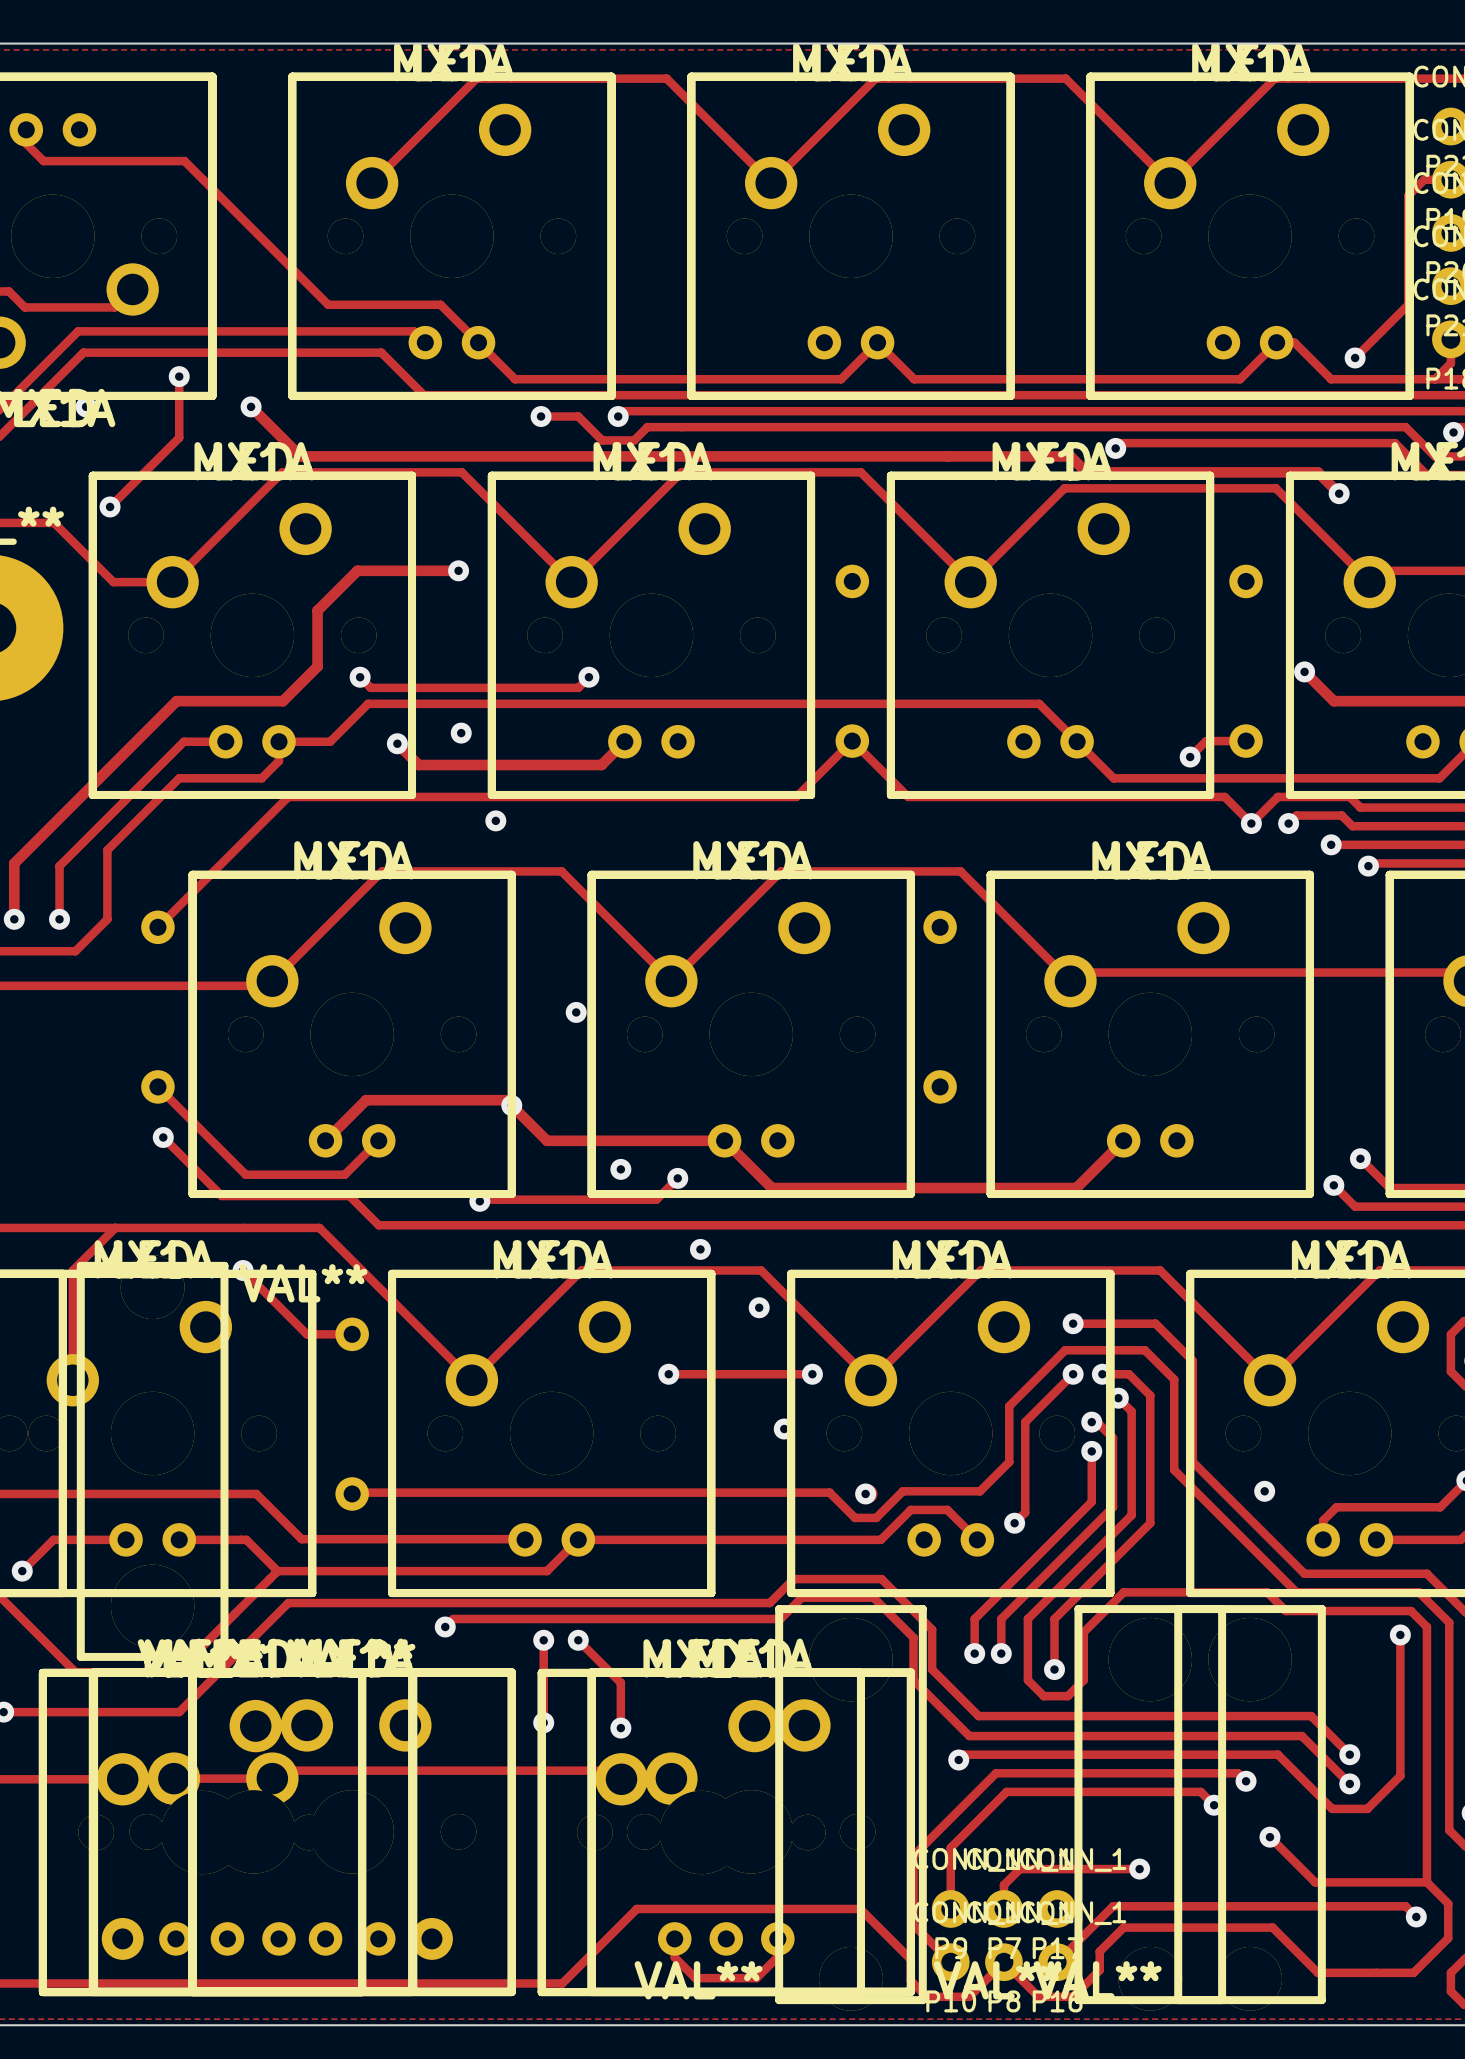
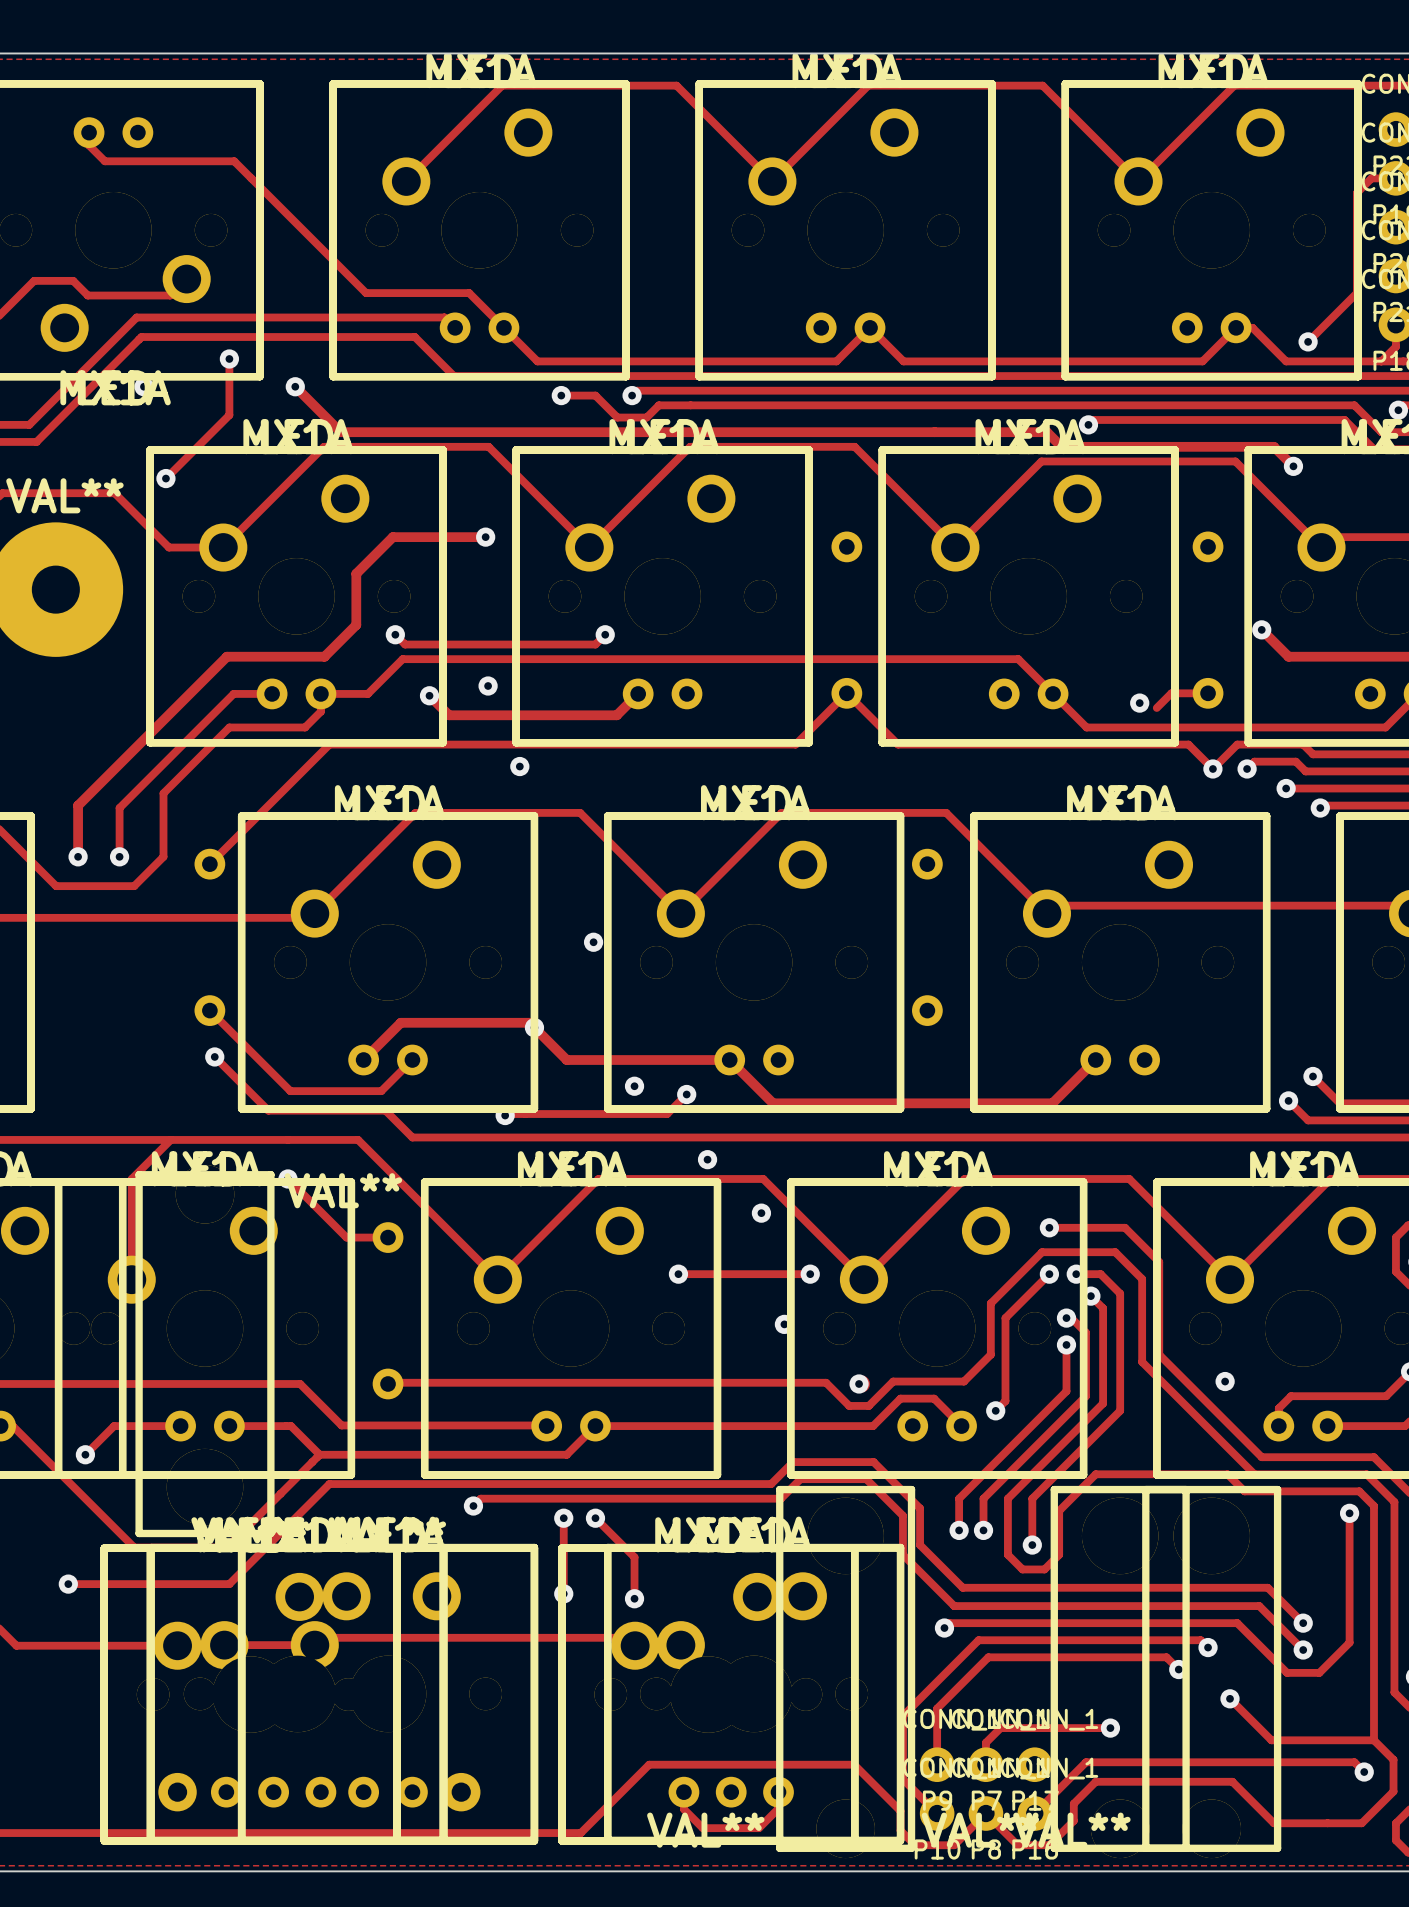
via position: (1190, 757) -> (1139, 703)

